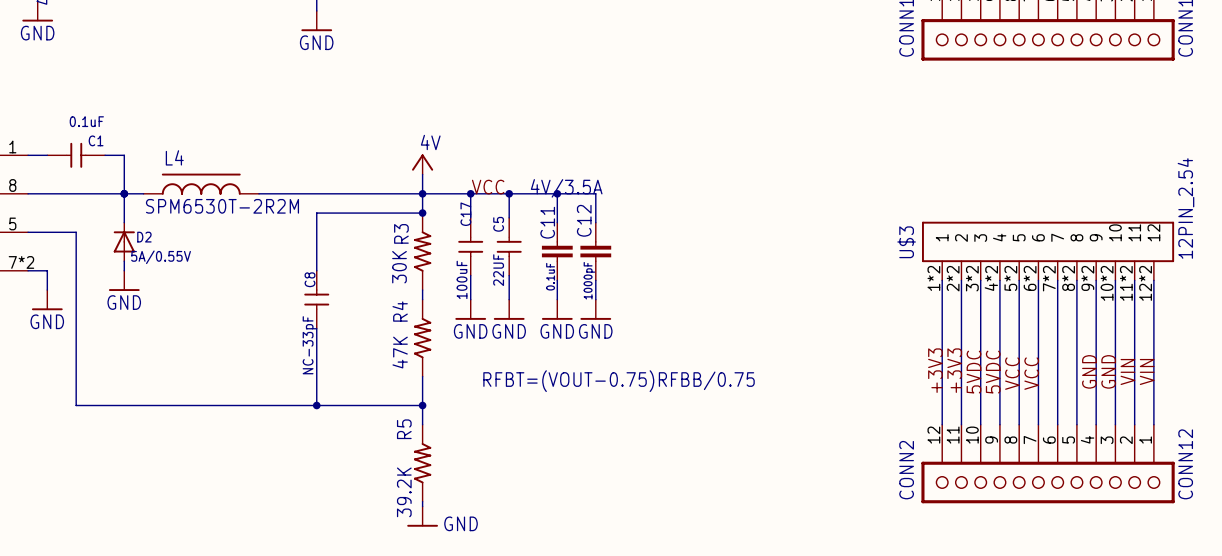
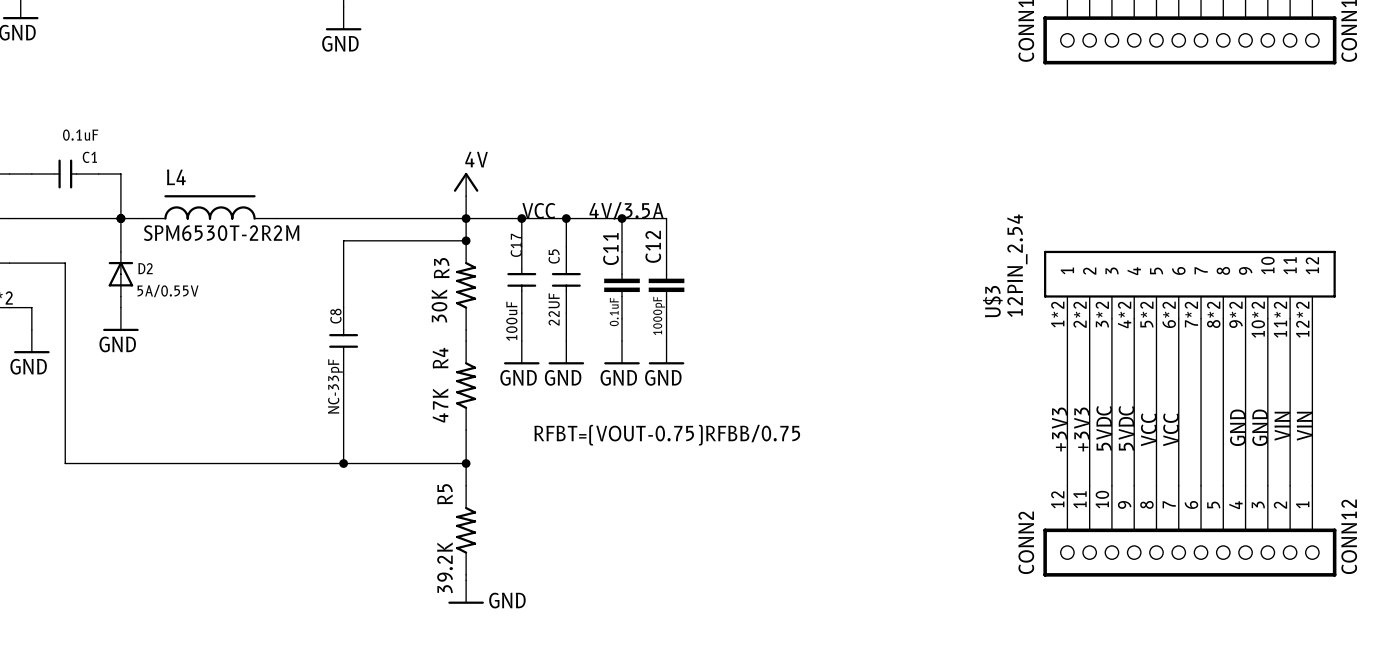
U$3 value position: 12PIN_2.54 (1185, 208) -> 12PIN_2.54 (1017, 265)
U$3 name position: U$3 (906, 242) -> U$3 (992, 301)

